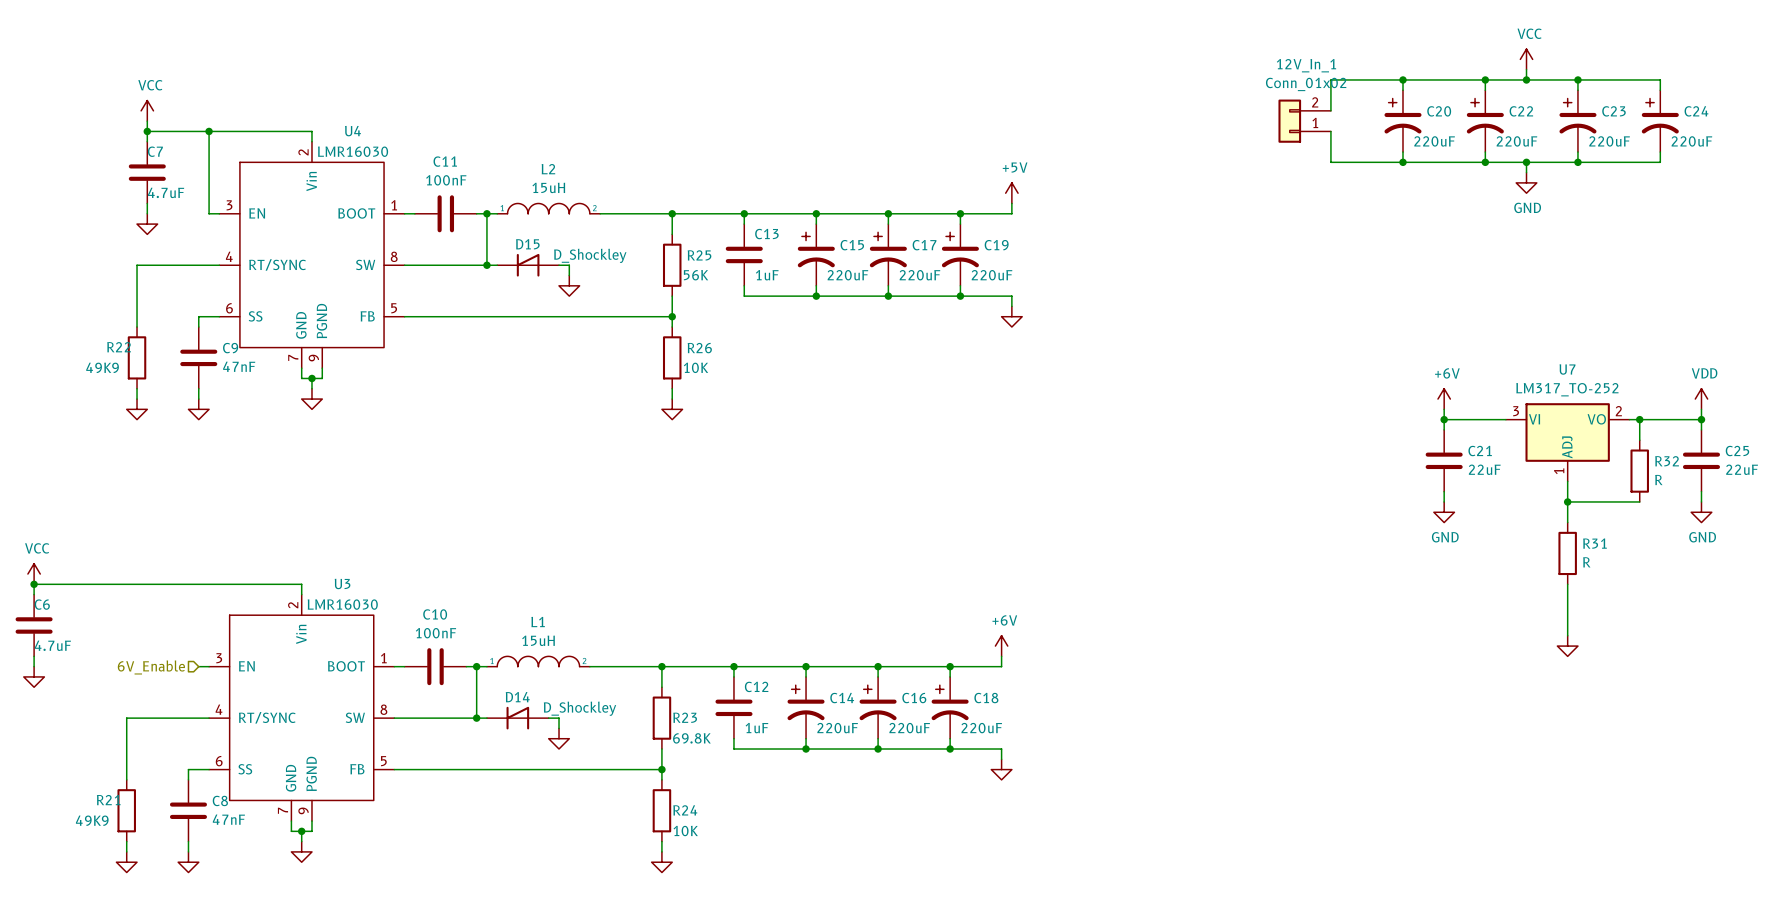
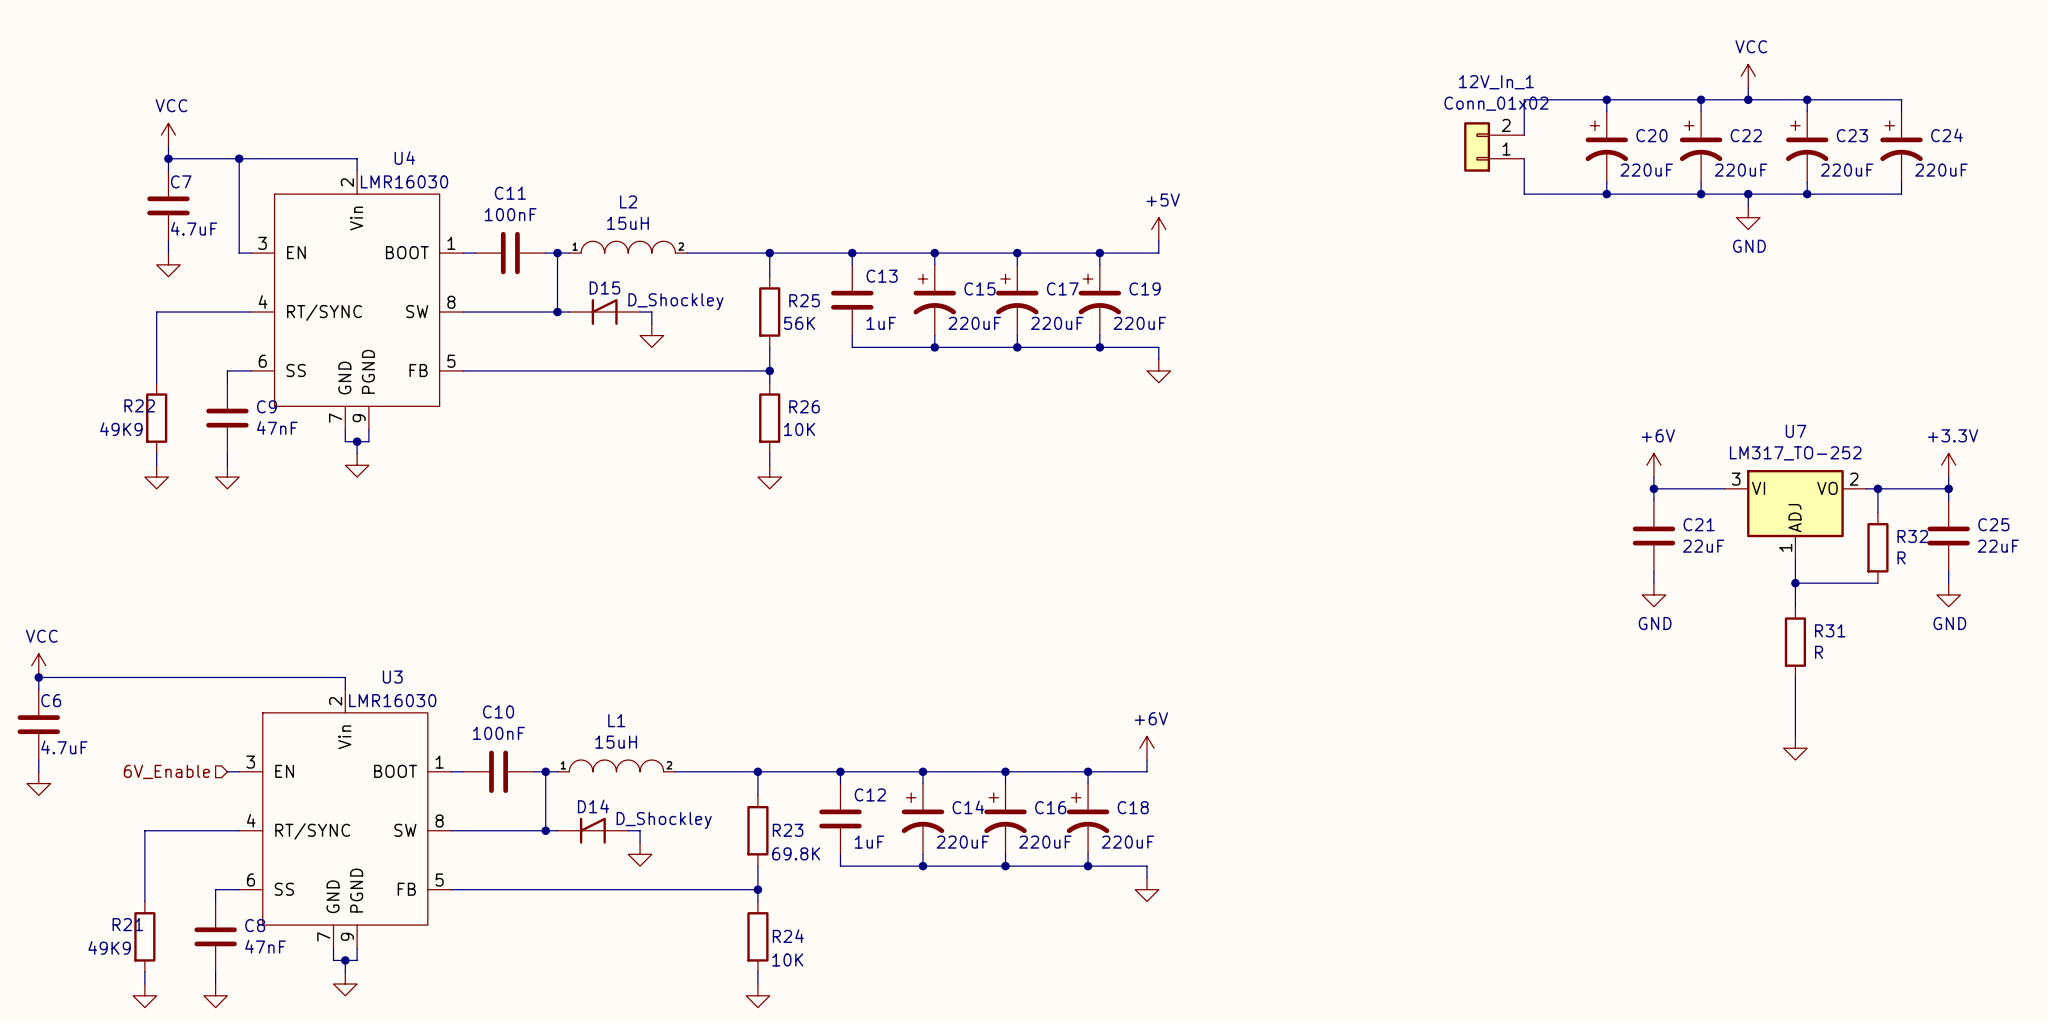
power symbol: VDD (1701, 399) -> +3.3V (1948, 465)

